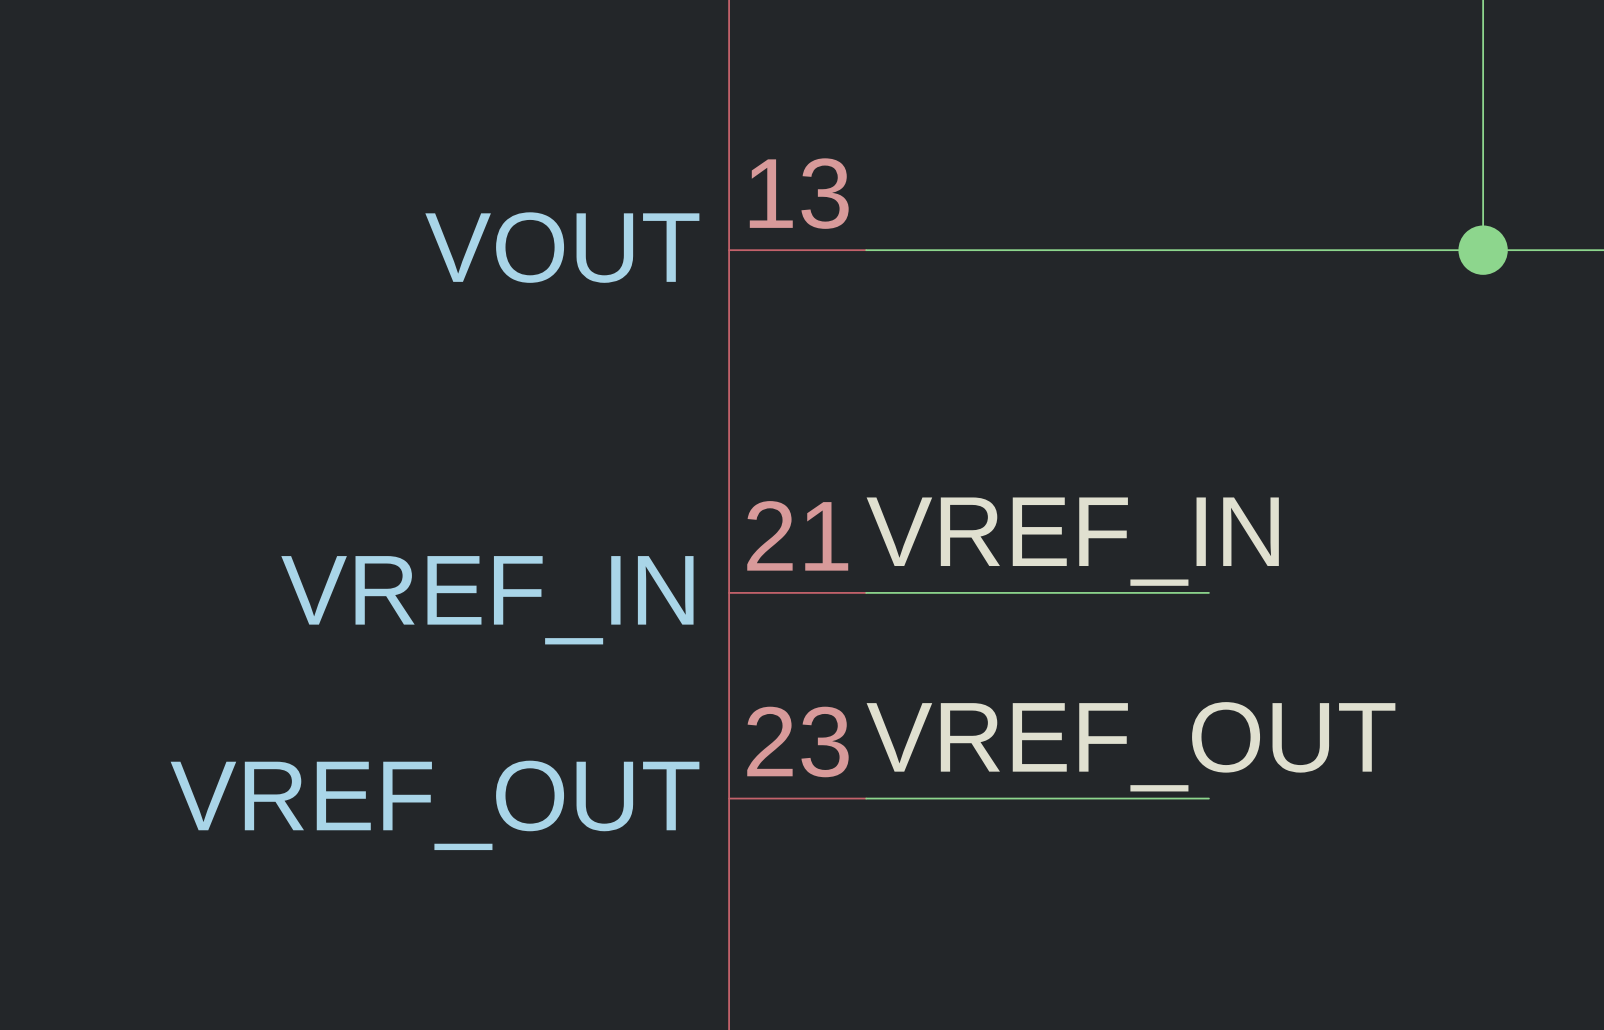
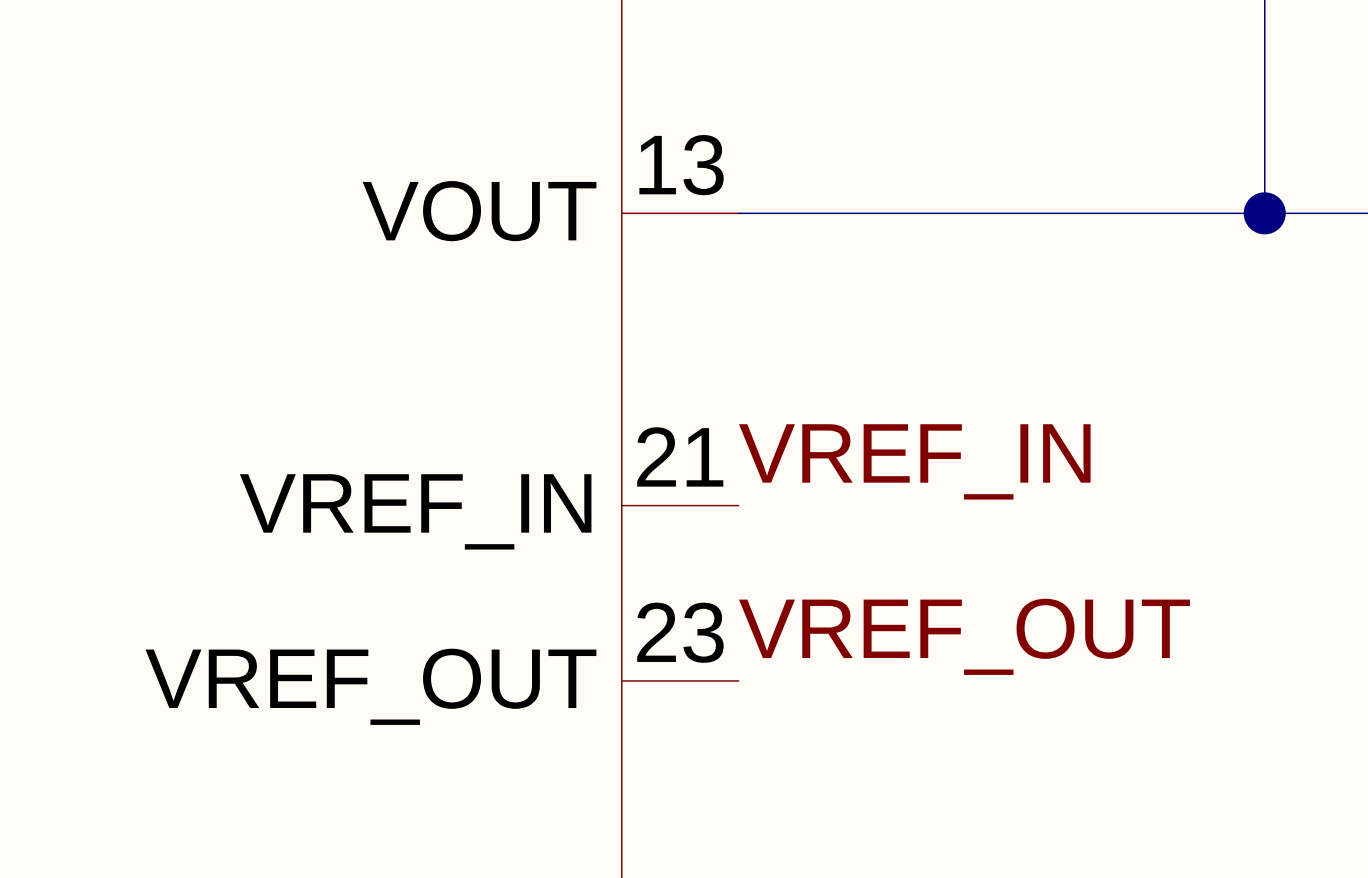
wire: (866, 592) (1208, 592) -> none
wire: (866, 798) (1208, 798) -> none

